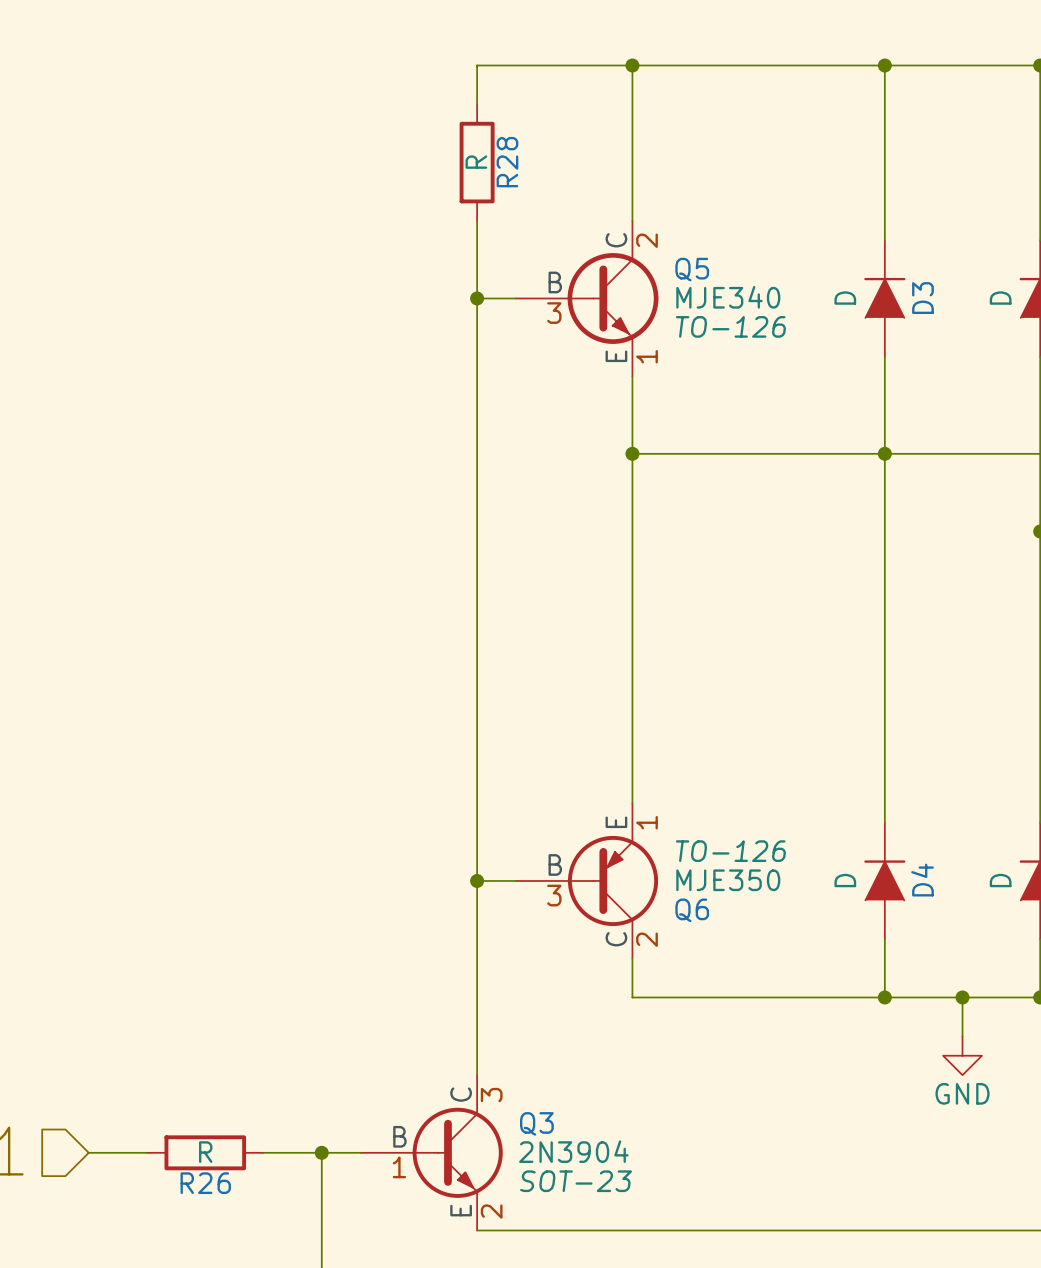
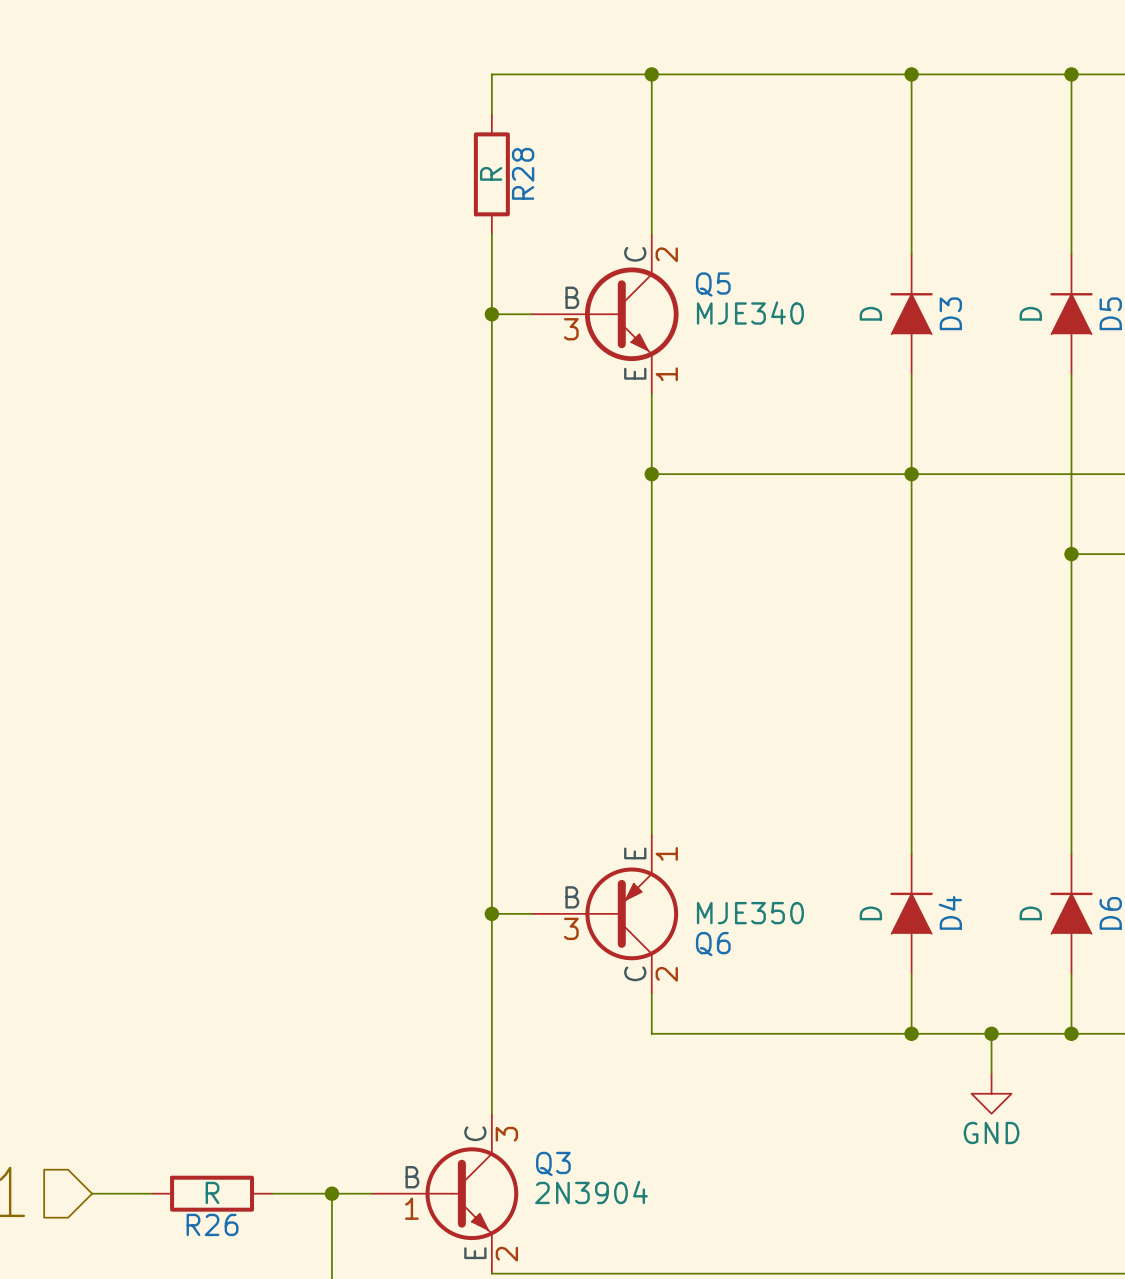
Q5 text: TO-126 (730, 326) -> none
Q6 text: TO-126 (730, 851) -> none
Q3 text: SOT-23 (576, 1181) -> none

